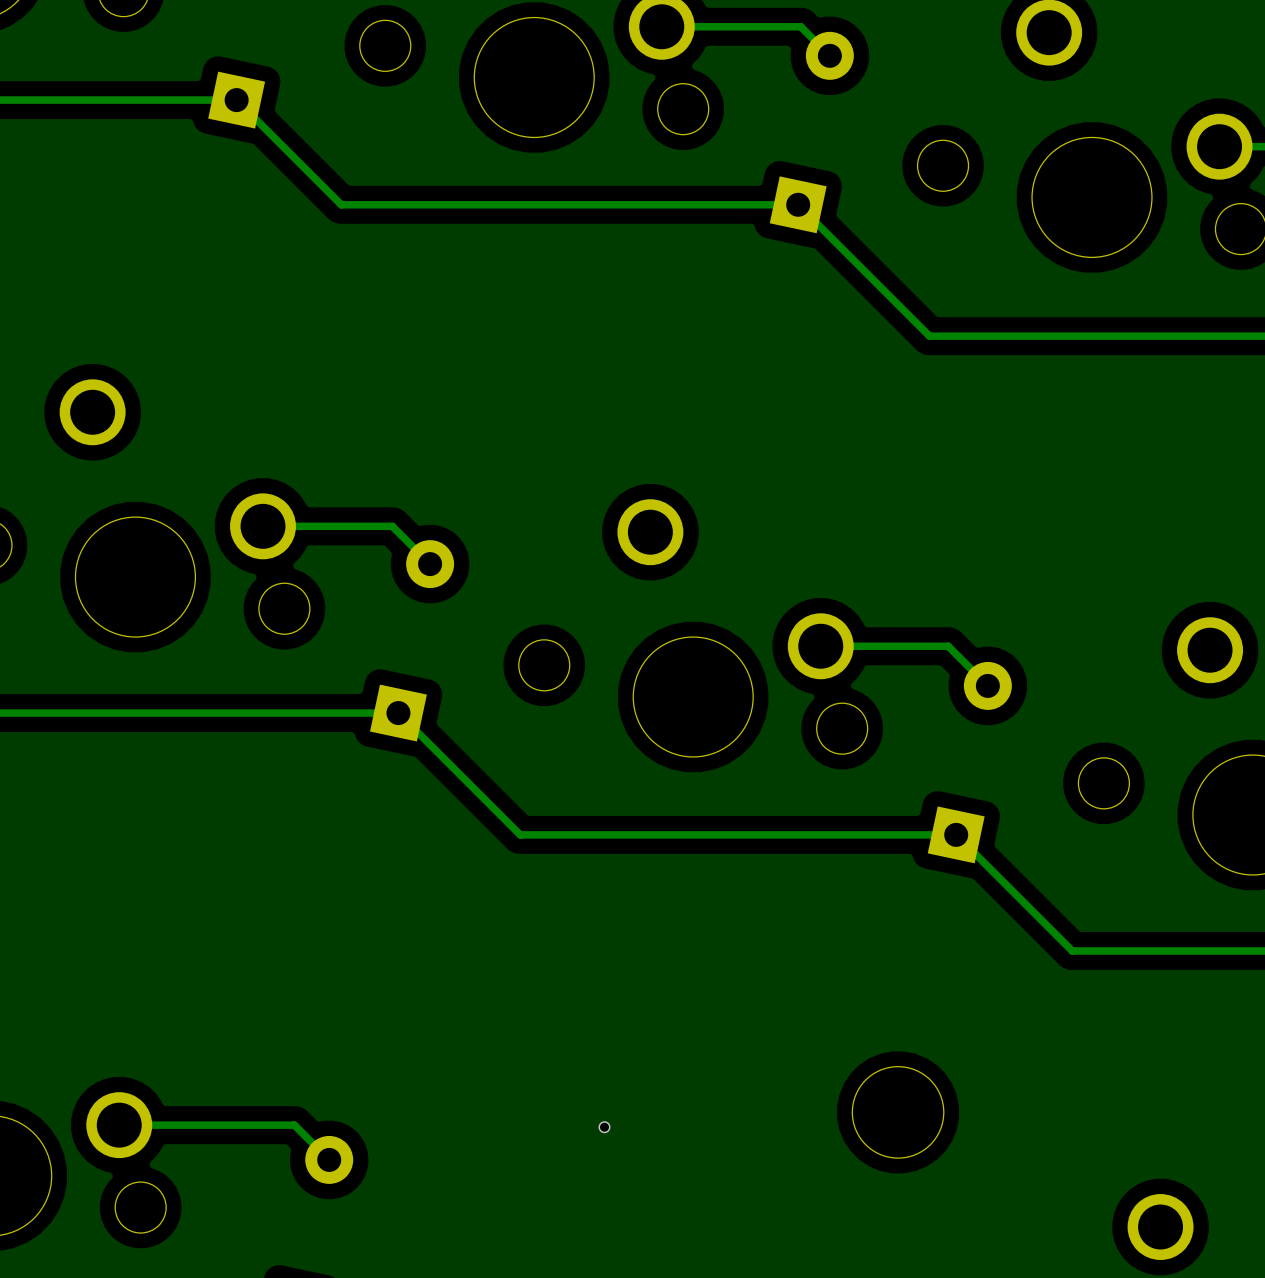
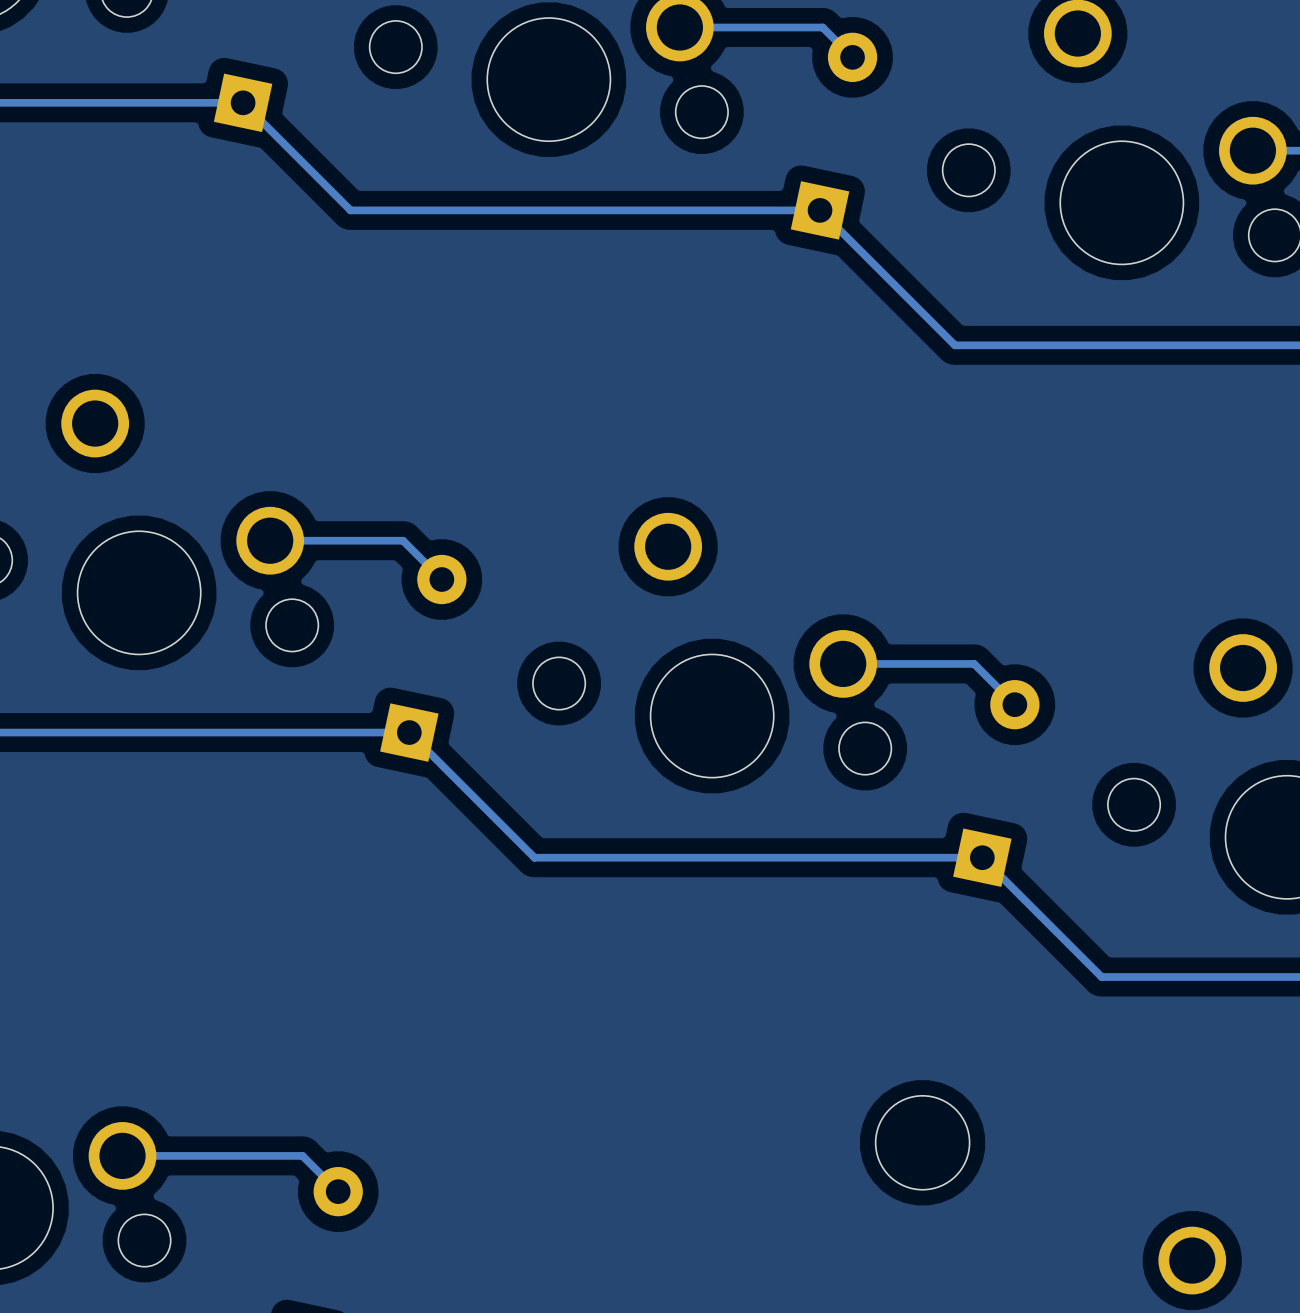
via: (604, 1127) -> none

